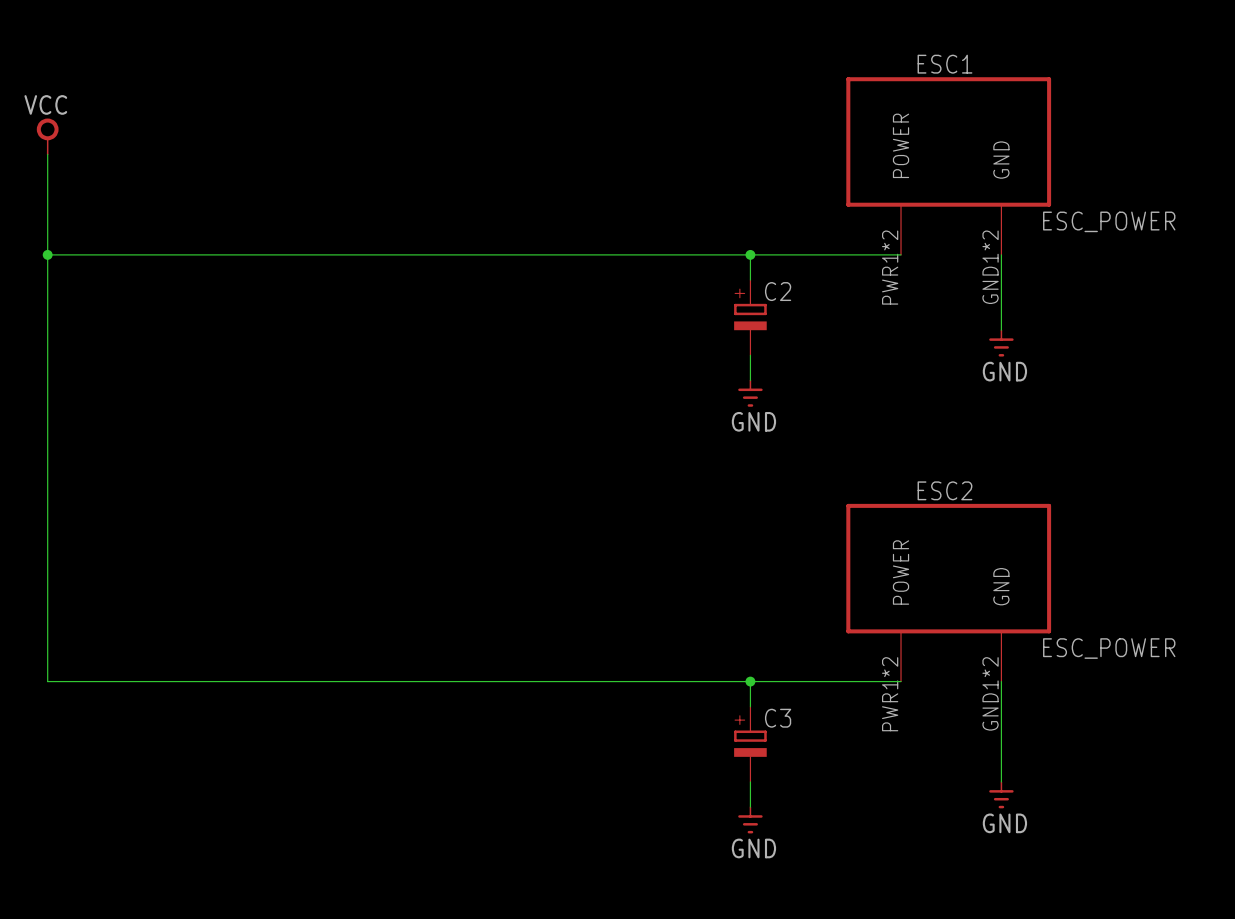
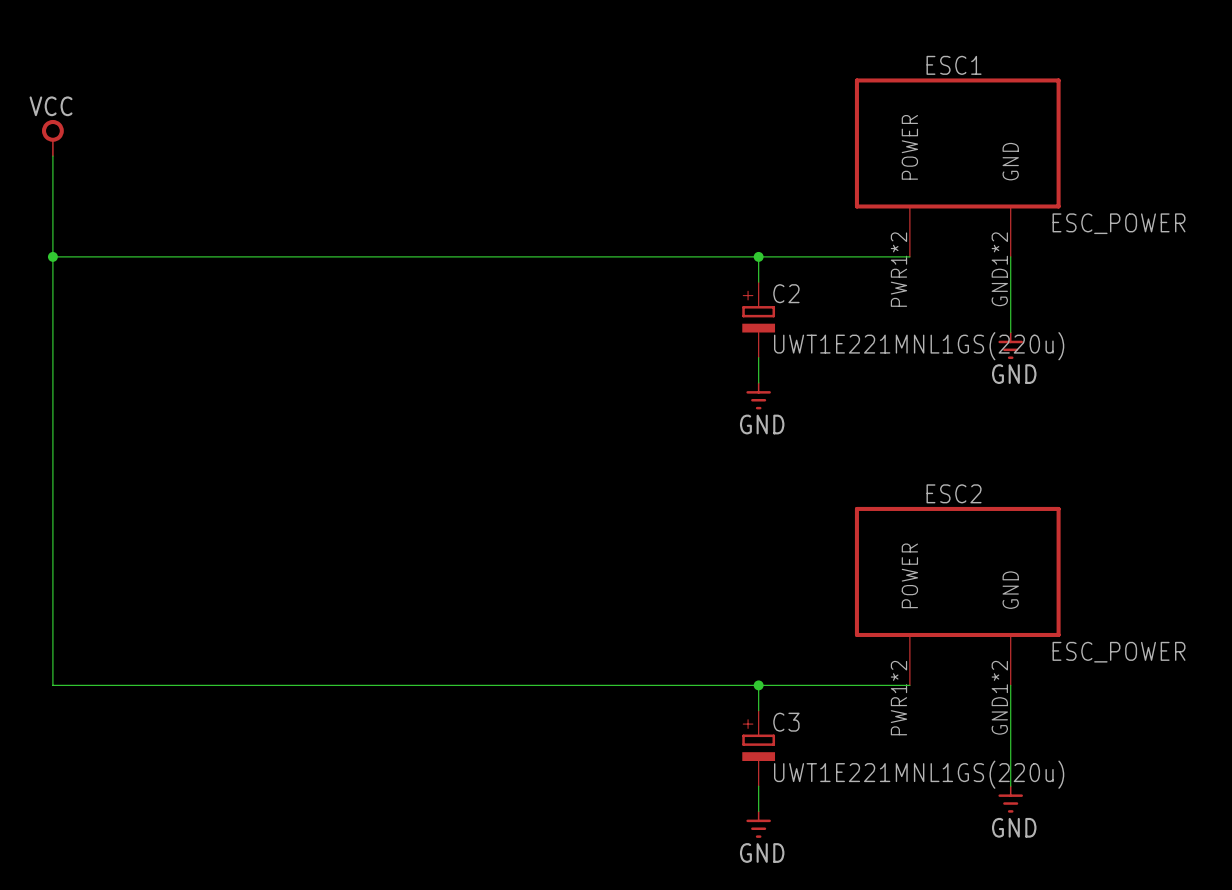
C2 value: none -> UWT1E221MNL1GS(220u) (919, 346)
C3 value: none -> UWT1E221MNL1GS(220u) (919, 774)

